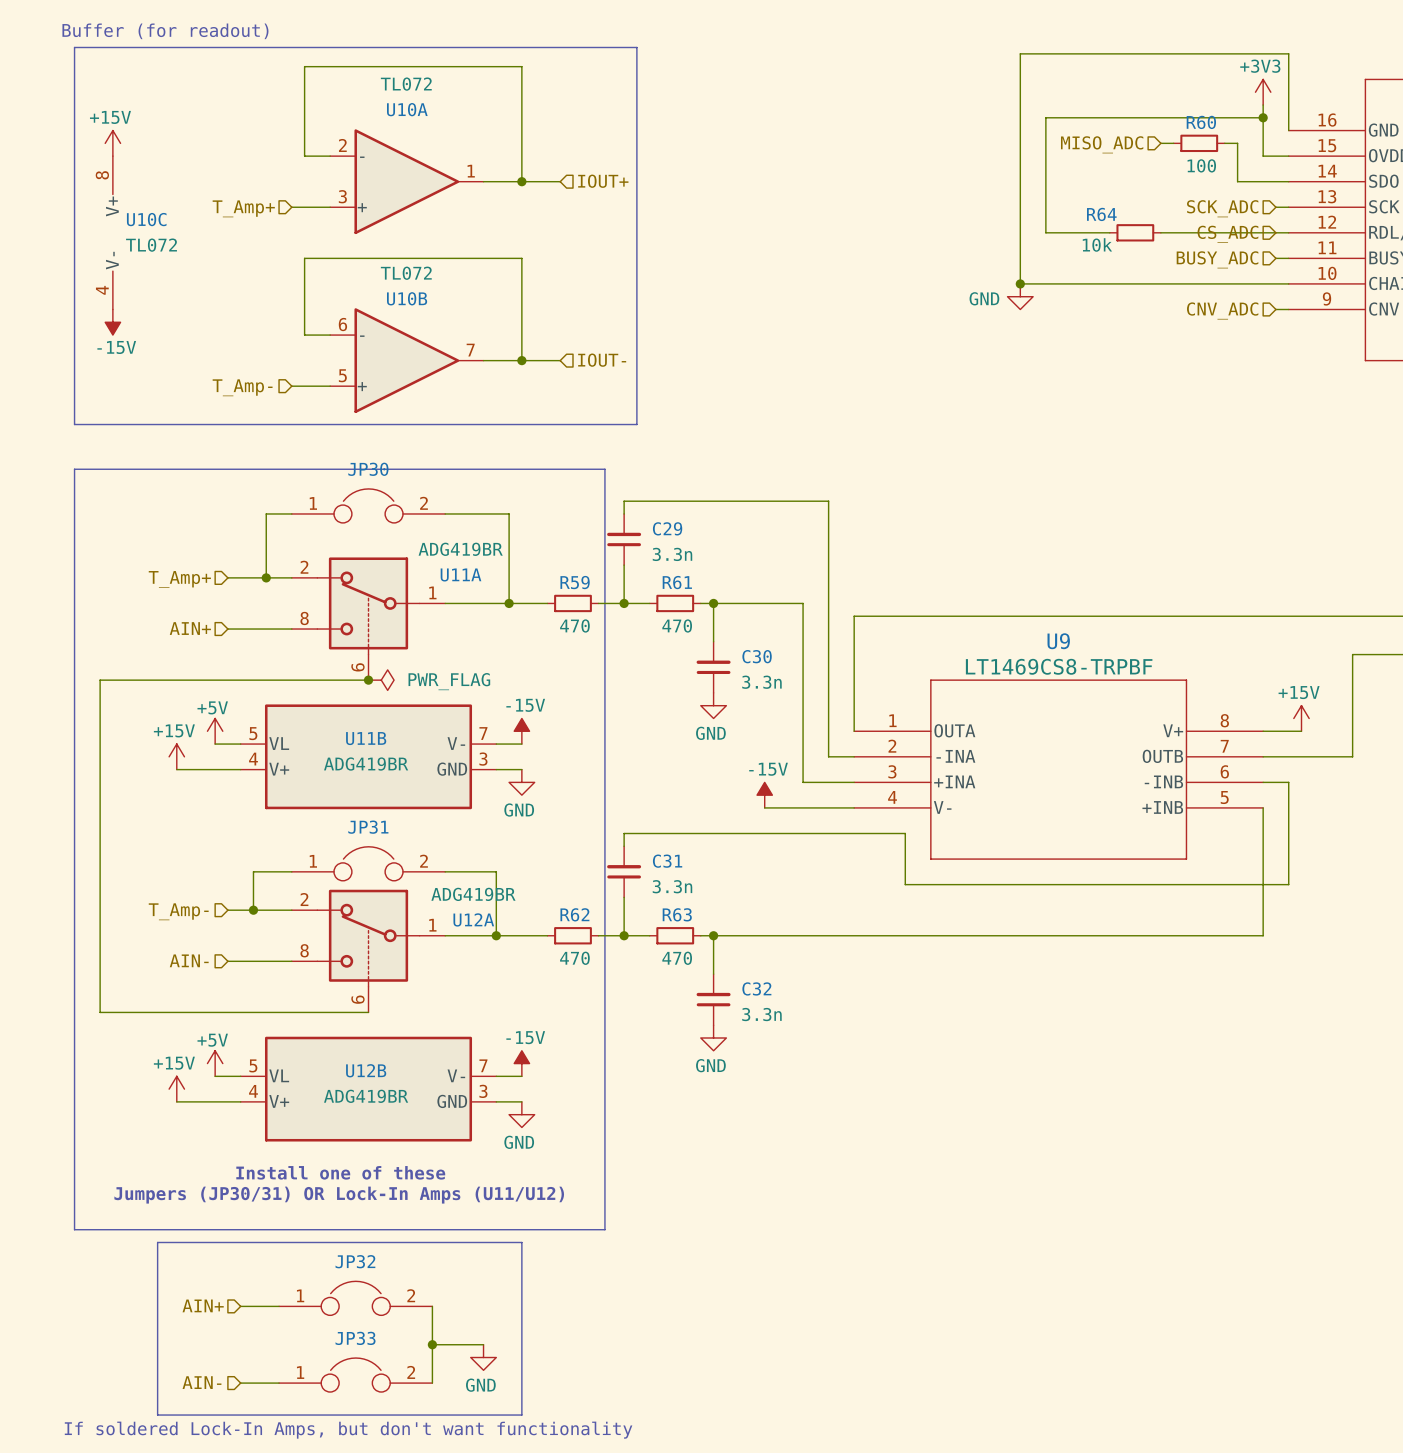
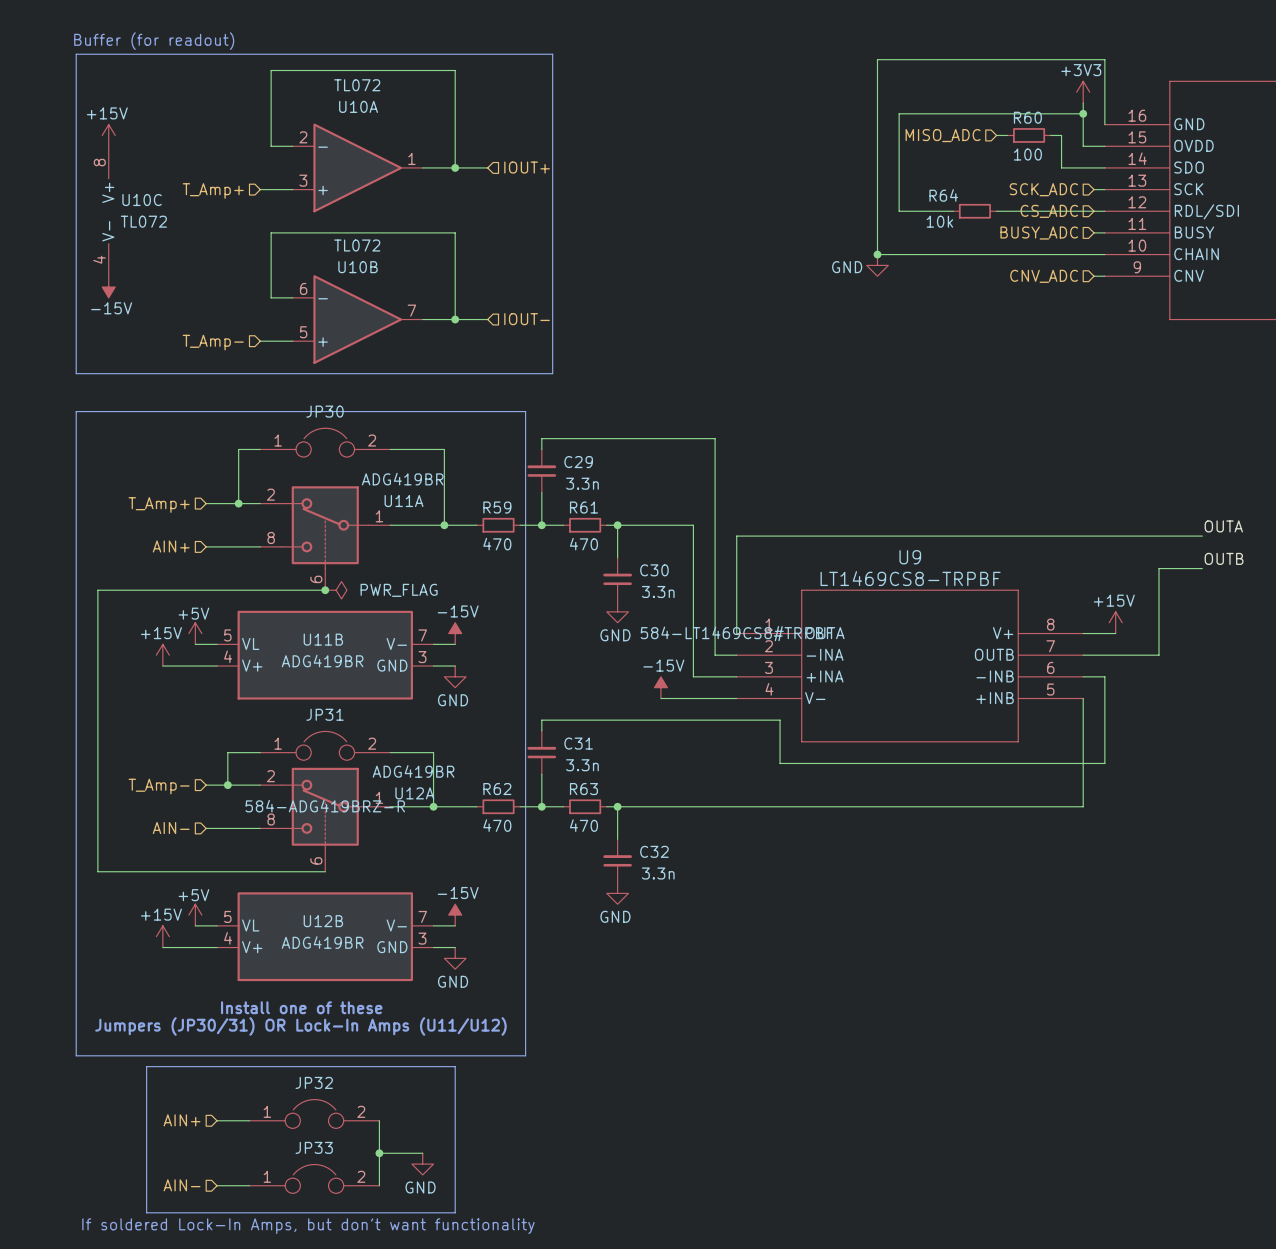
U9 text: none -> 584-LT1469CS8#TRPBF (736, 633)
U12A text: none -> 584-ADG419BRZ-R (325, 806)

